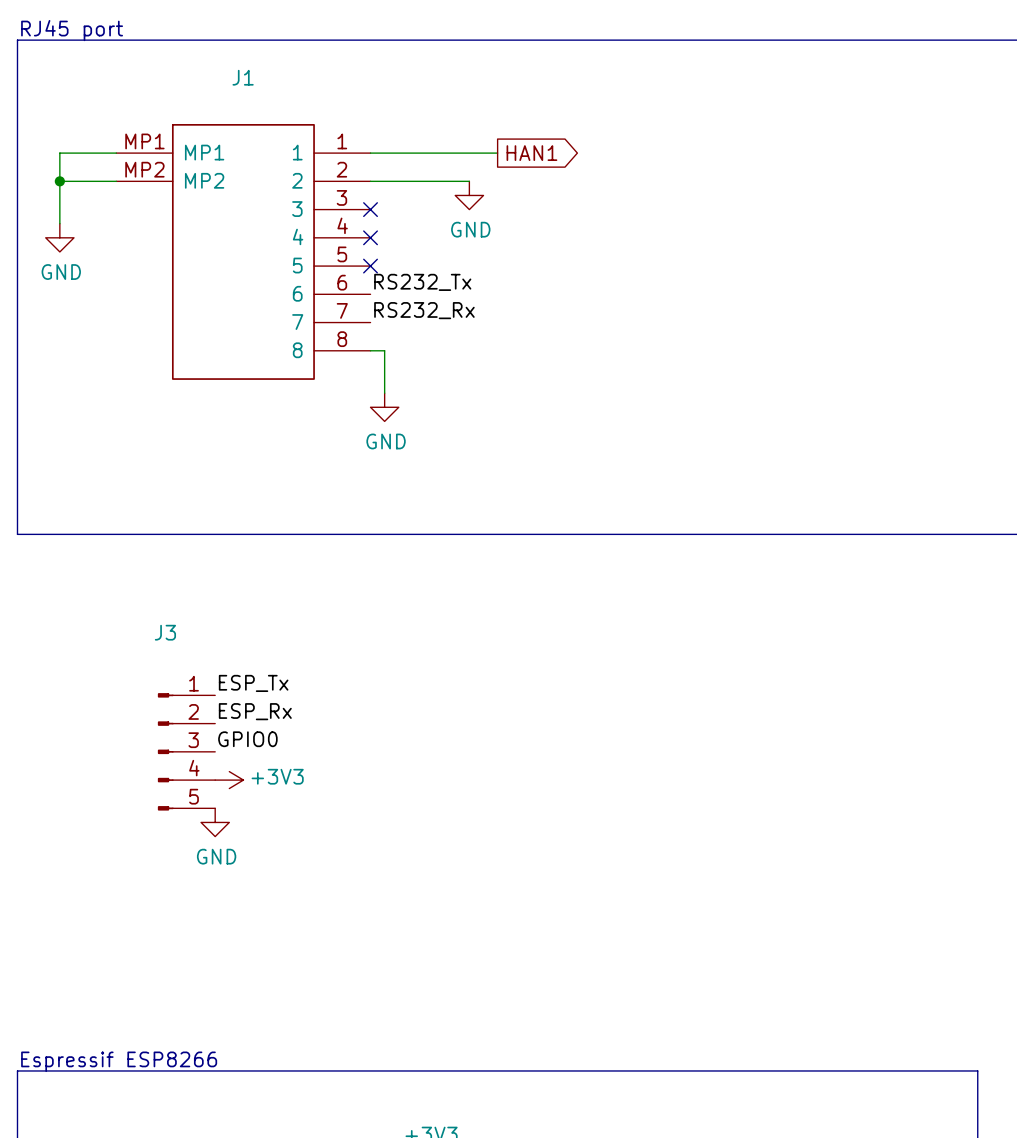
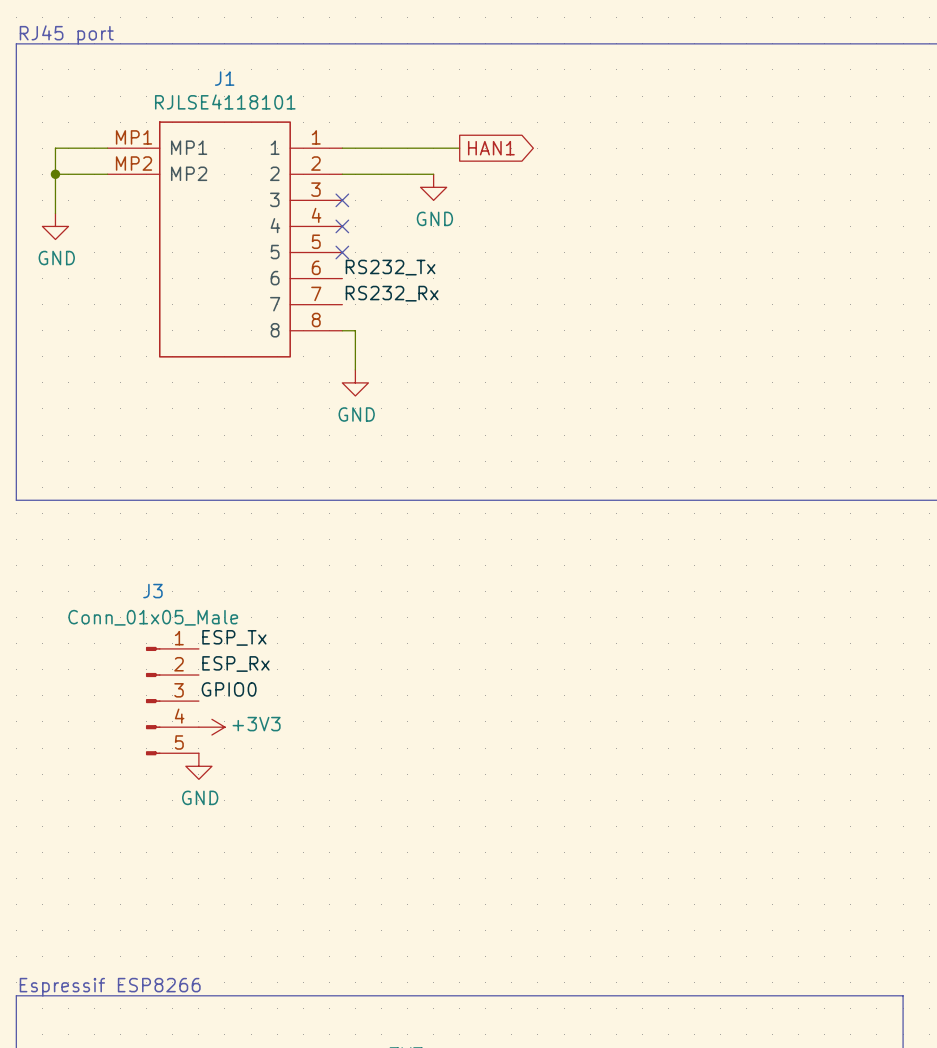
J1 value: none -> RJLSE4118101 (225, 102)
J3 value: none -> Conn_01x05_Male (153, 617)

